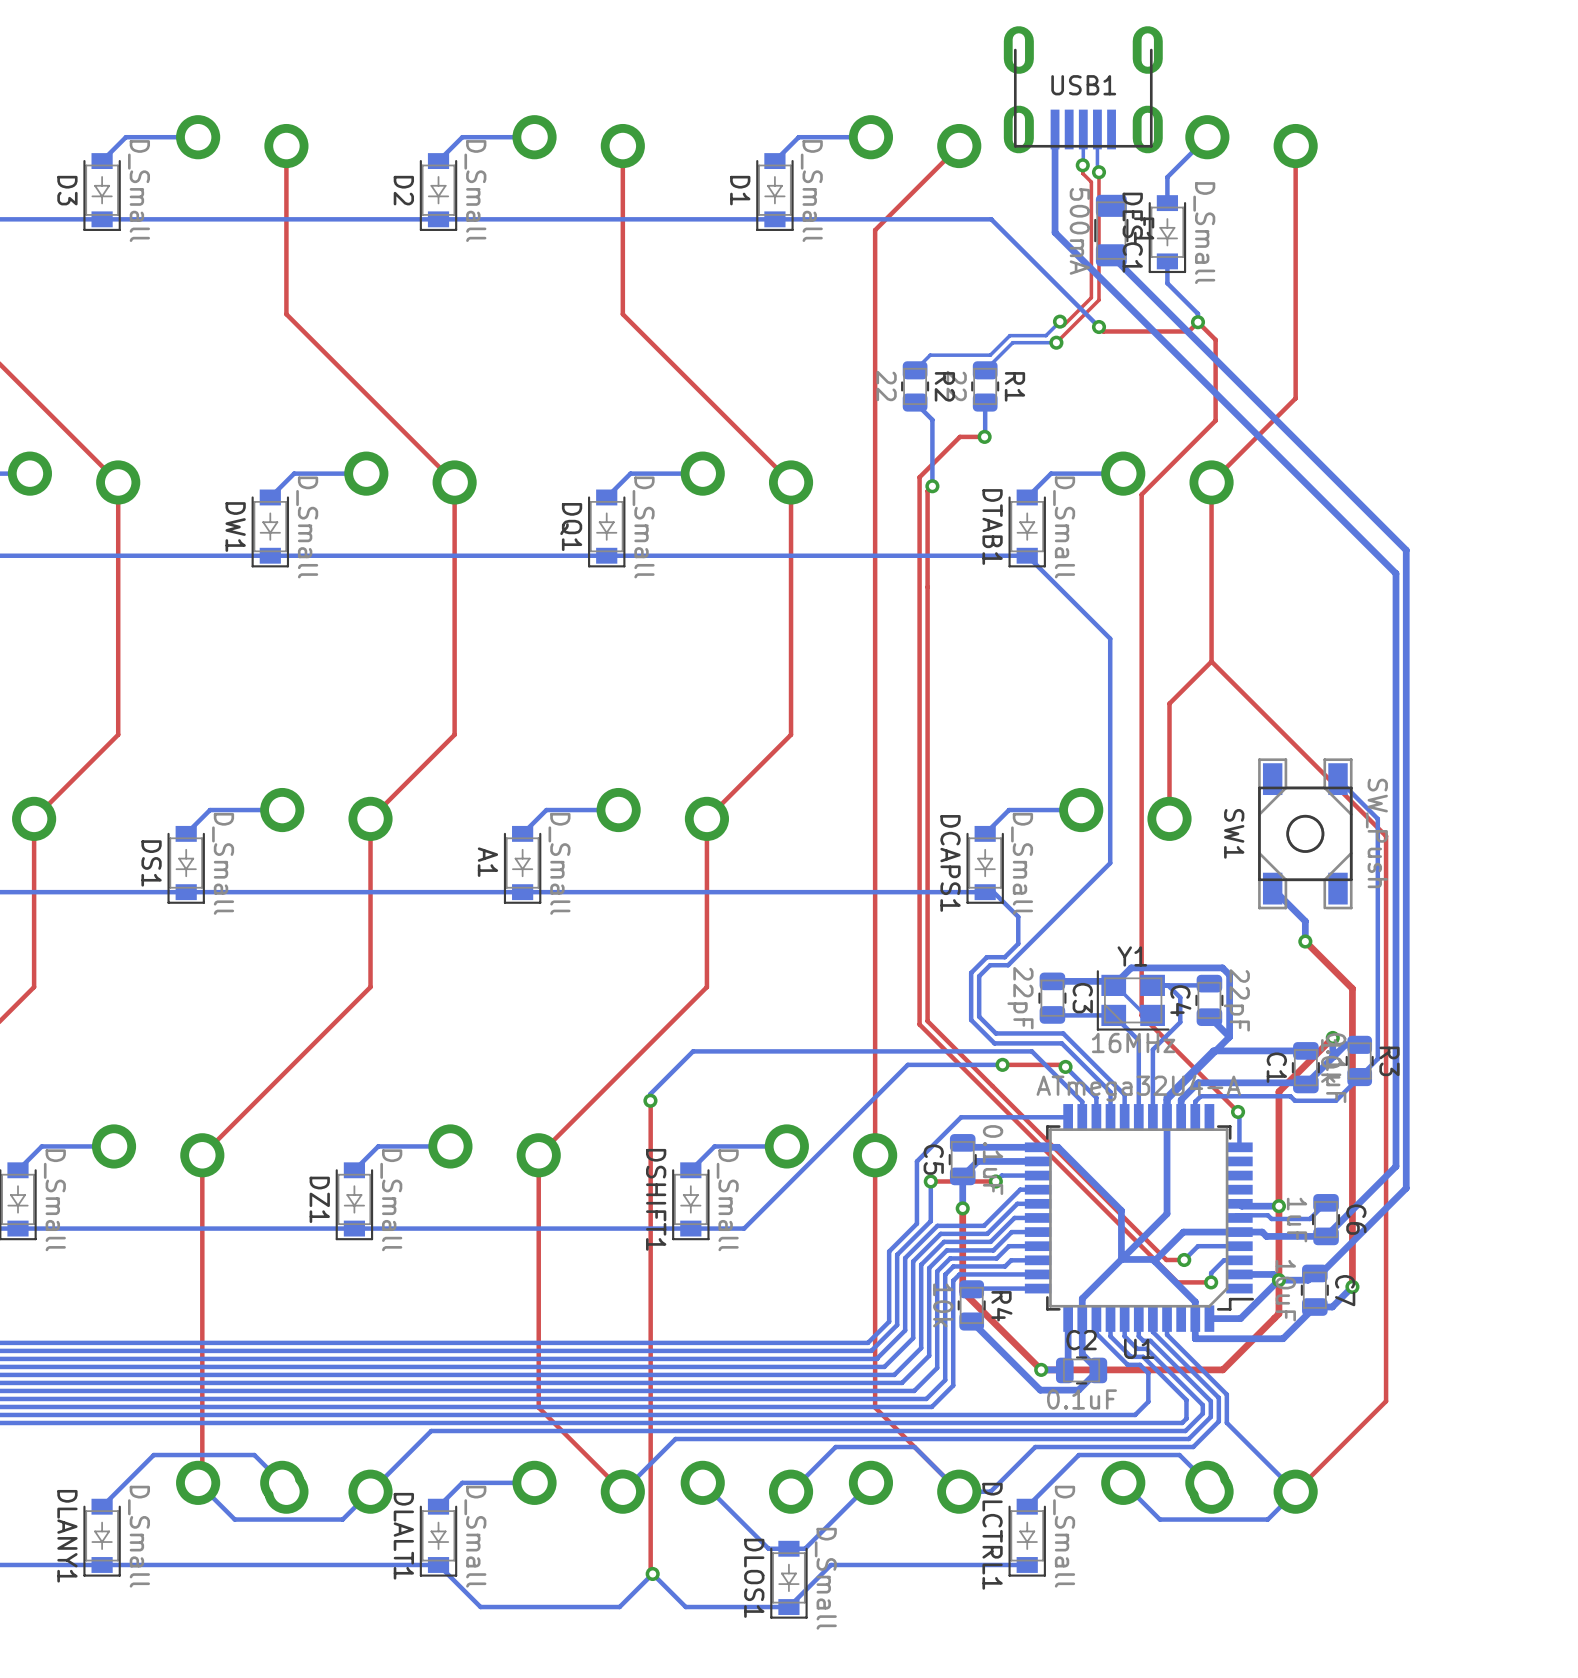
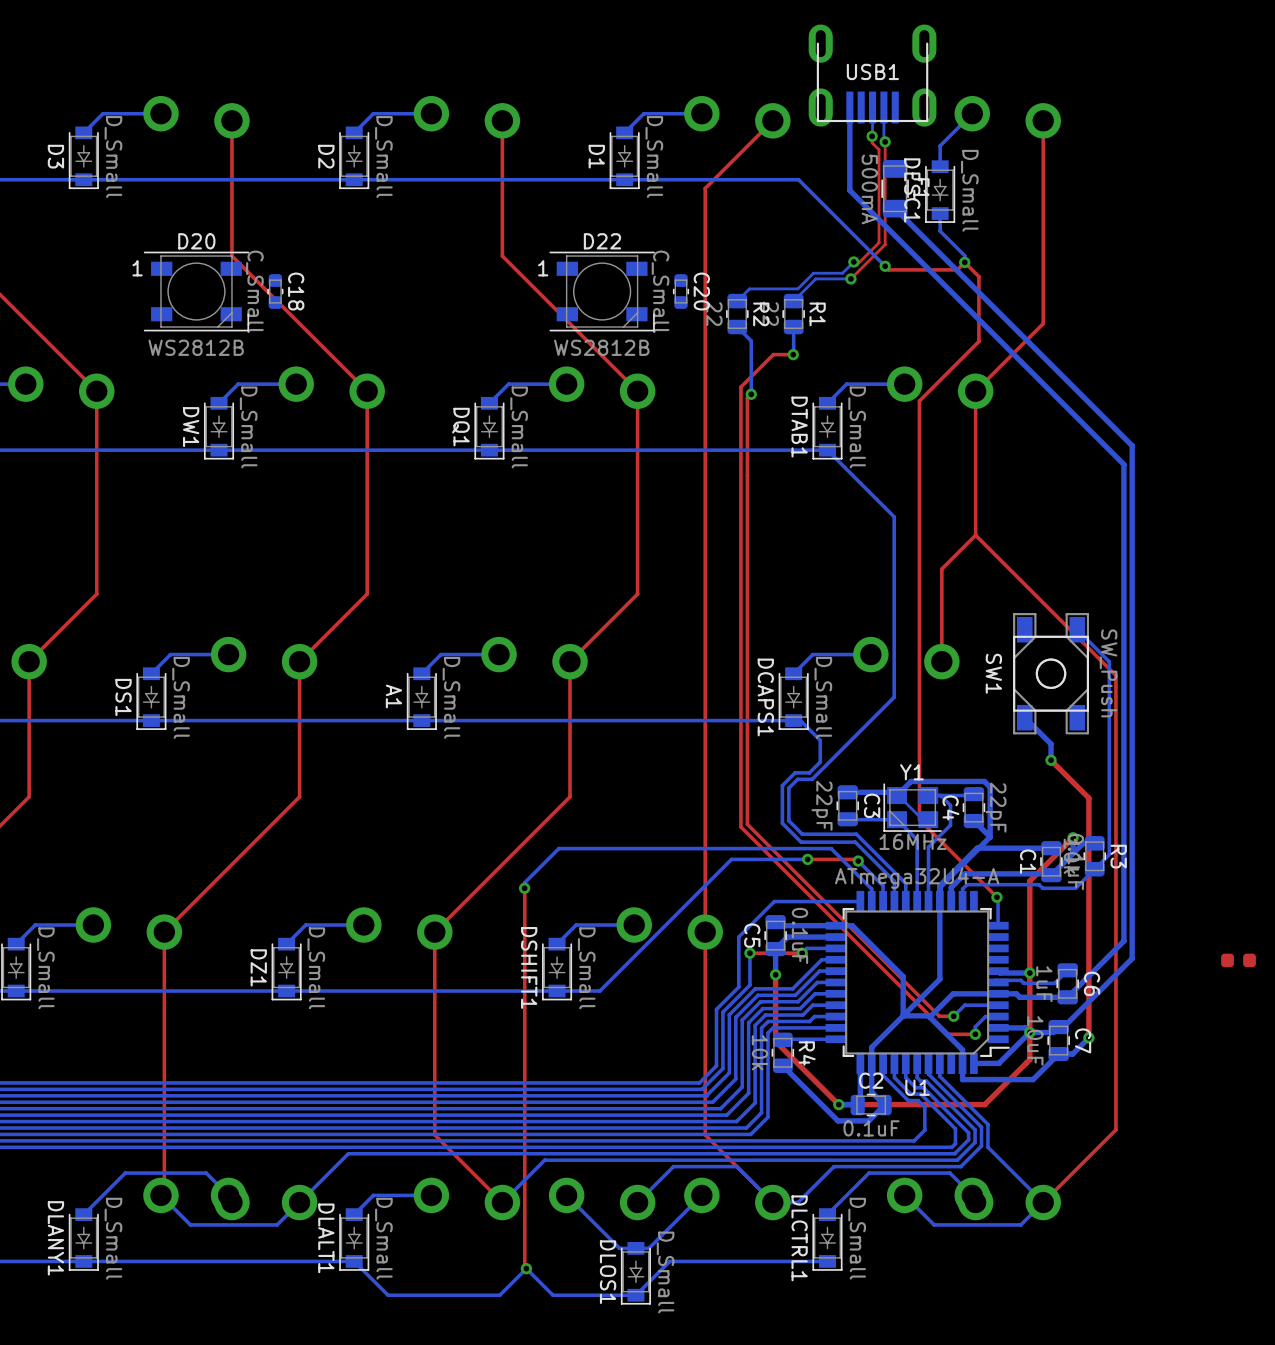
D20: none -> WS2812B (196, 291)
C18: none -> C_Small (275, 291)
D22: none -> WS2812B (602, 291)
C20: none -> C_Small (681, 291)
part: none -> (1238, 960)

